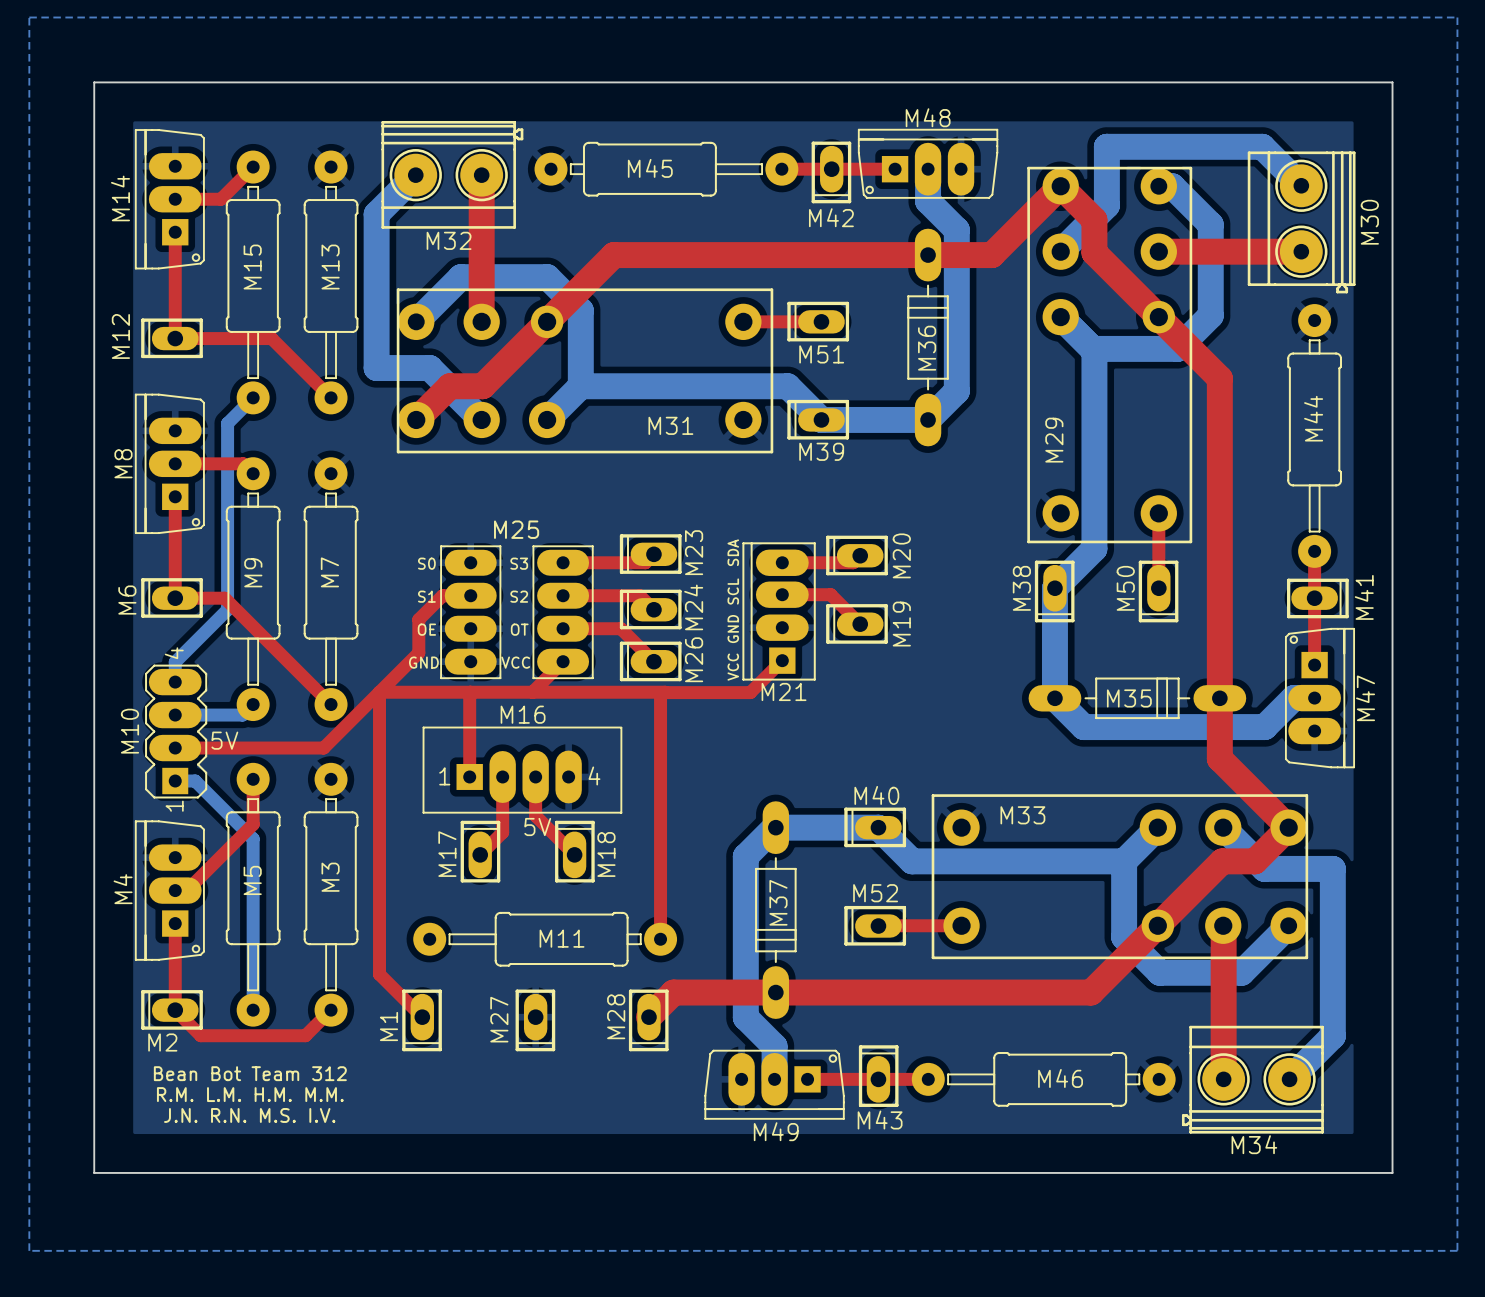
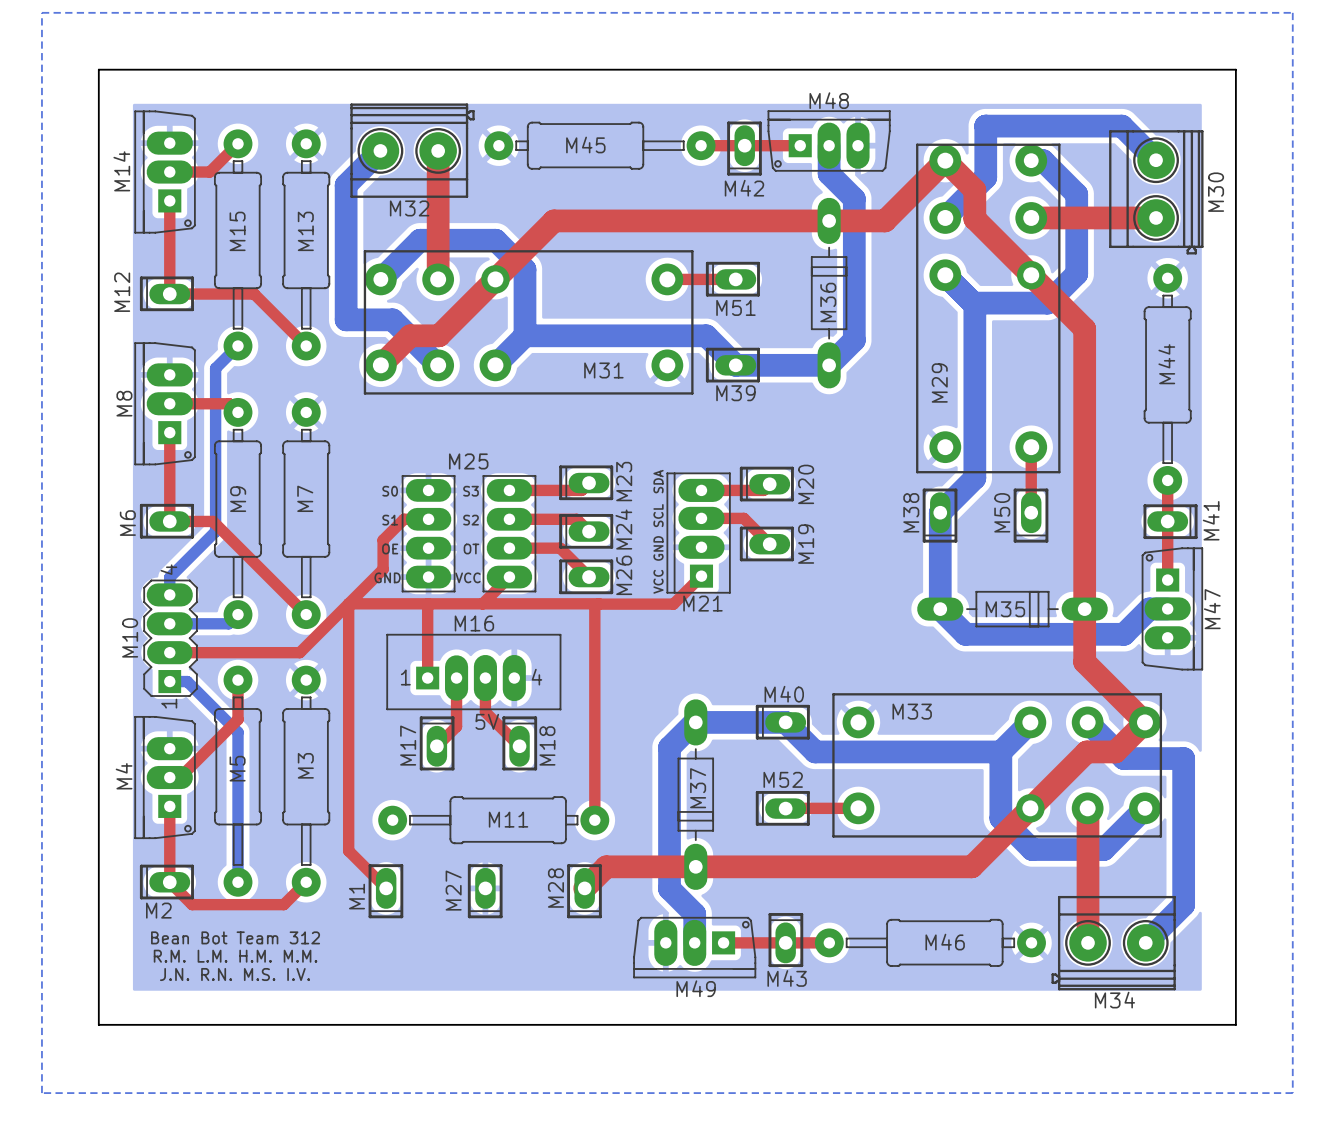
M10 text: 5V (224, 740) -> none

